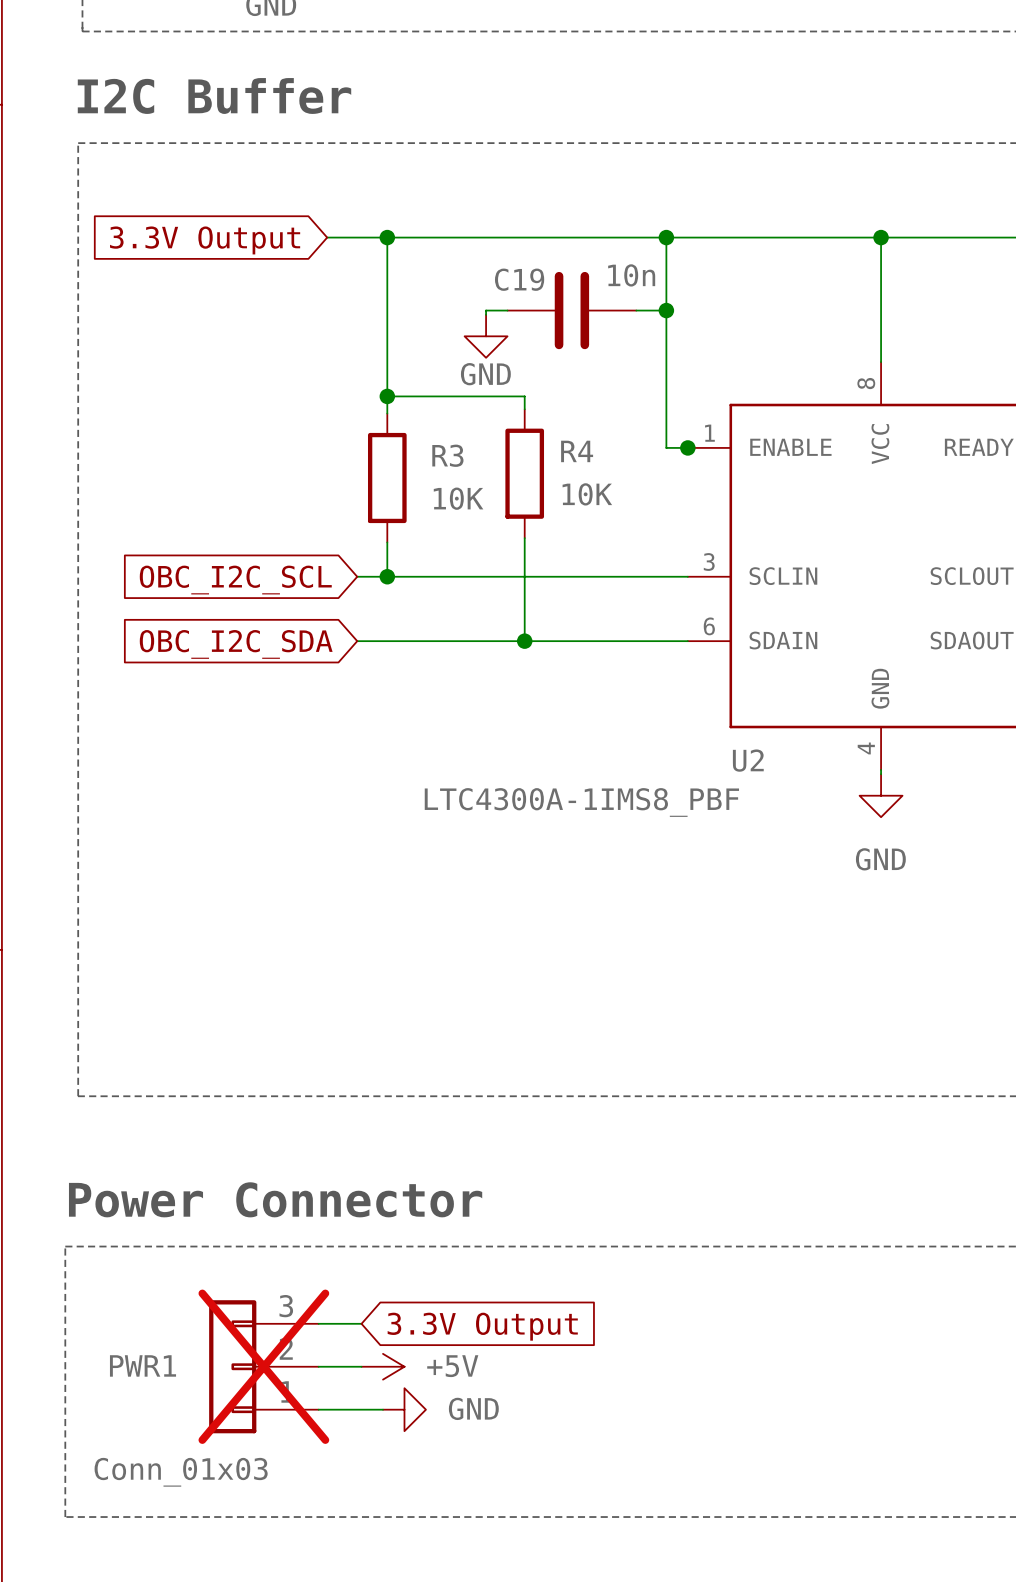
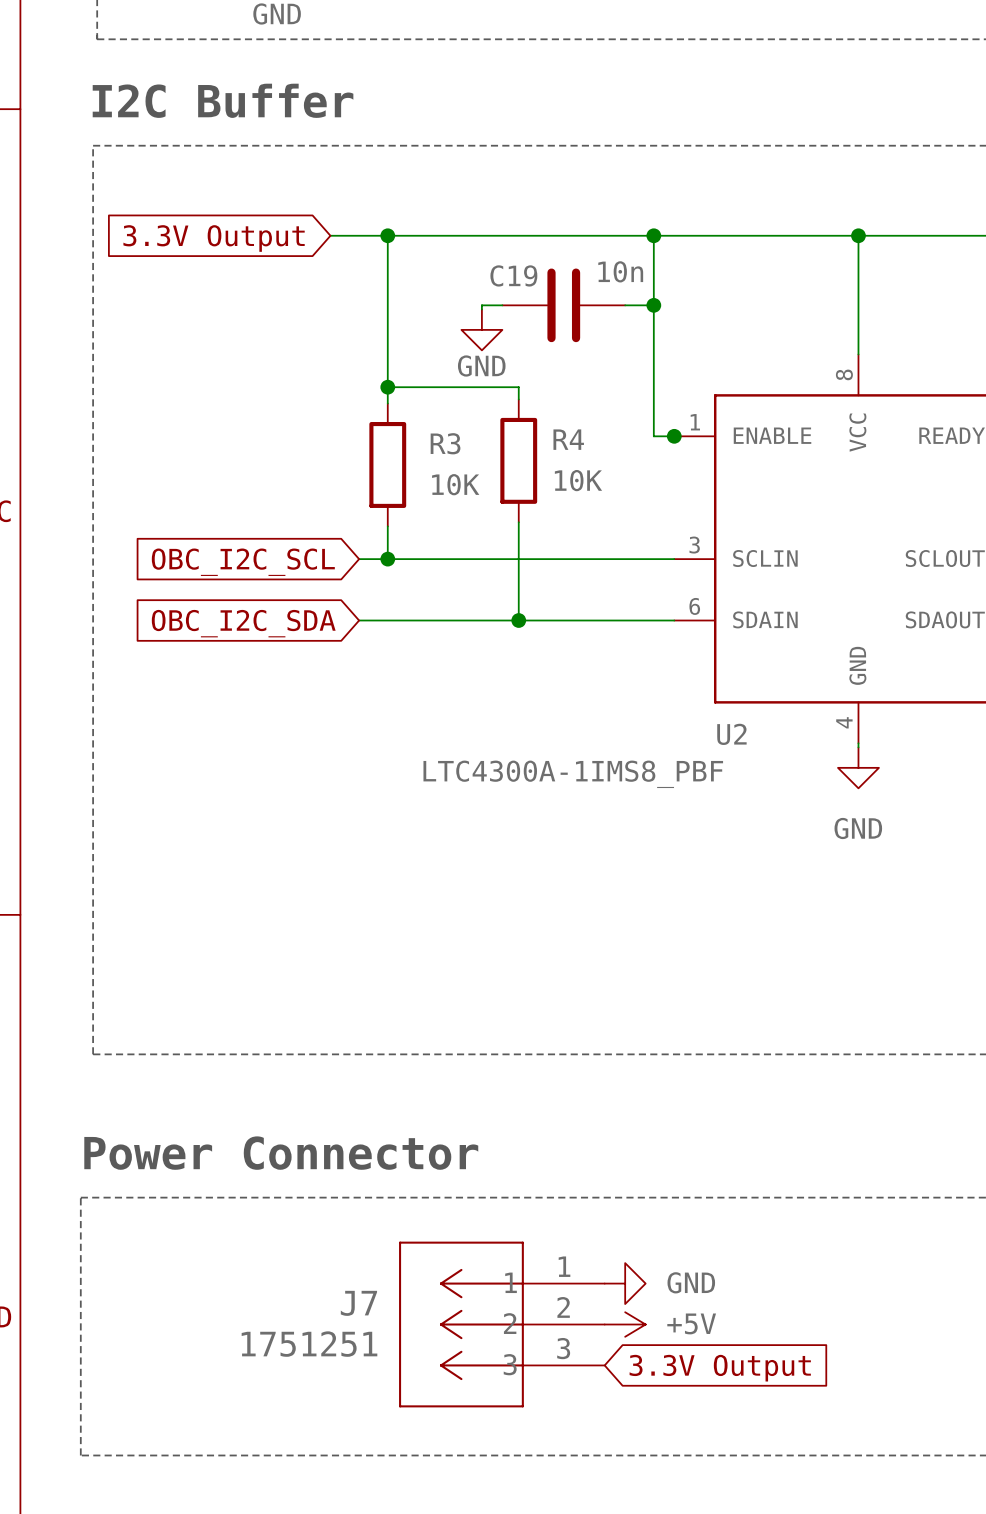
wire: (318, 1323) (361, 1323) -> none
global label position: 3.3V Output (482, 1326) -> 3.3V Output (720, 1368)
PWR1: Conn_01x03 (263, 1366) -> none
wire: (318, 1366) (361, 1366) -> none
power symbol position: +5V (383, 1366) -> +5V (625, 1324)
J7: none -> 1751251 (501, 1324)
wire: (318, 1409) (383, 1409) -> none
power symbol position: GND (404, 1409) -> GND (625, 1283)

